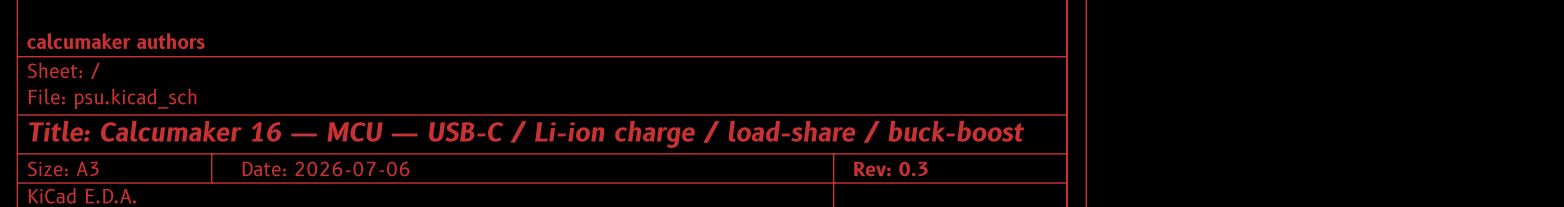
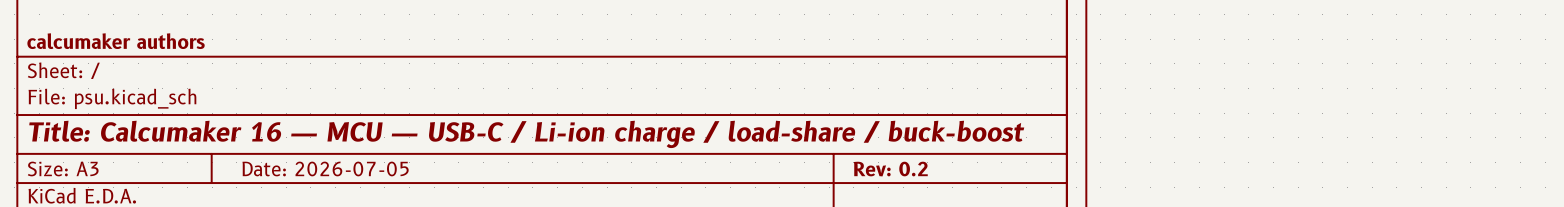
title block: Date: 2026-07-06 (325, 168) -> Date: 2026-07-05 (325, 168)
title block: Rev: 0.3 (890, 169) -> Rev: 0.2 (890, 169)

